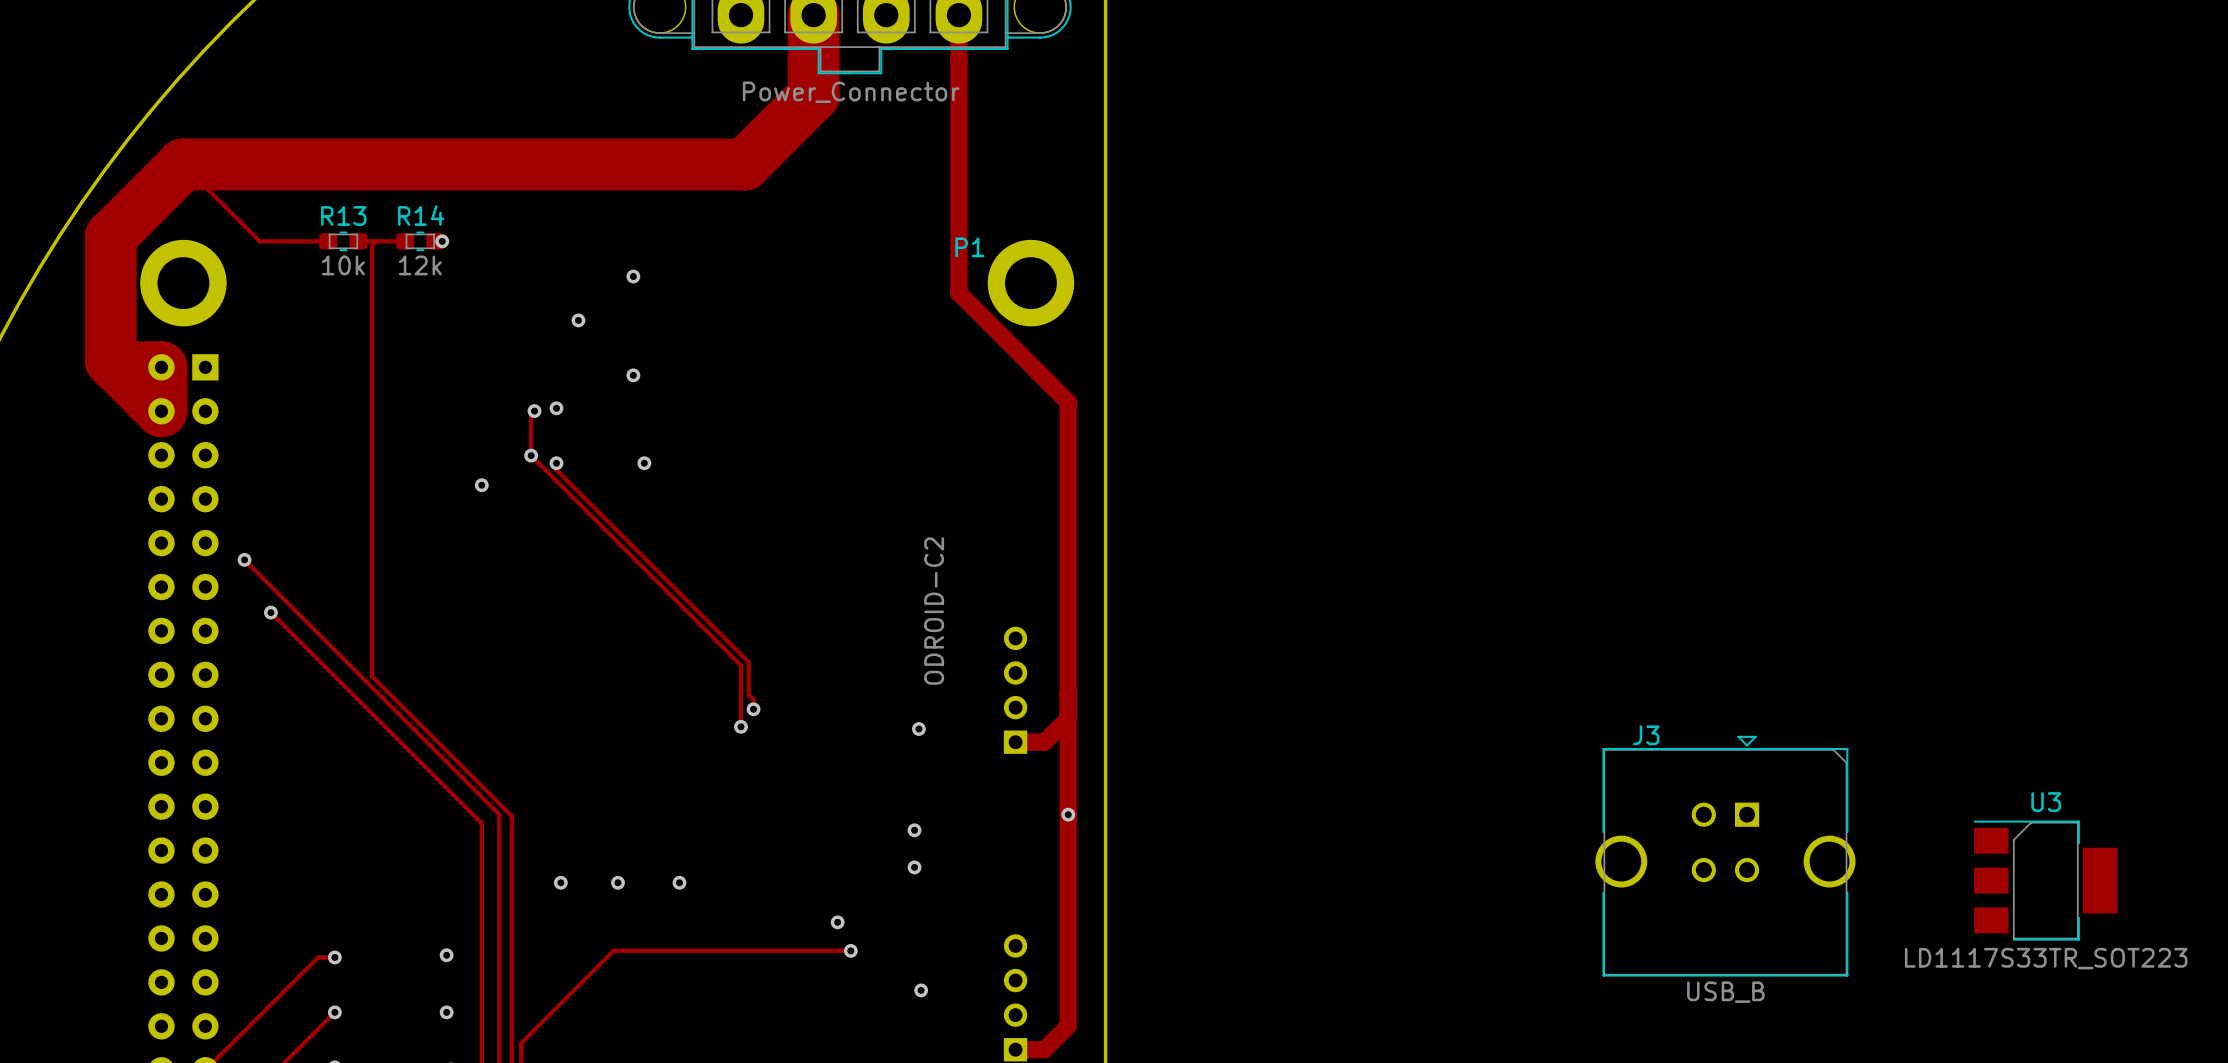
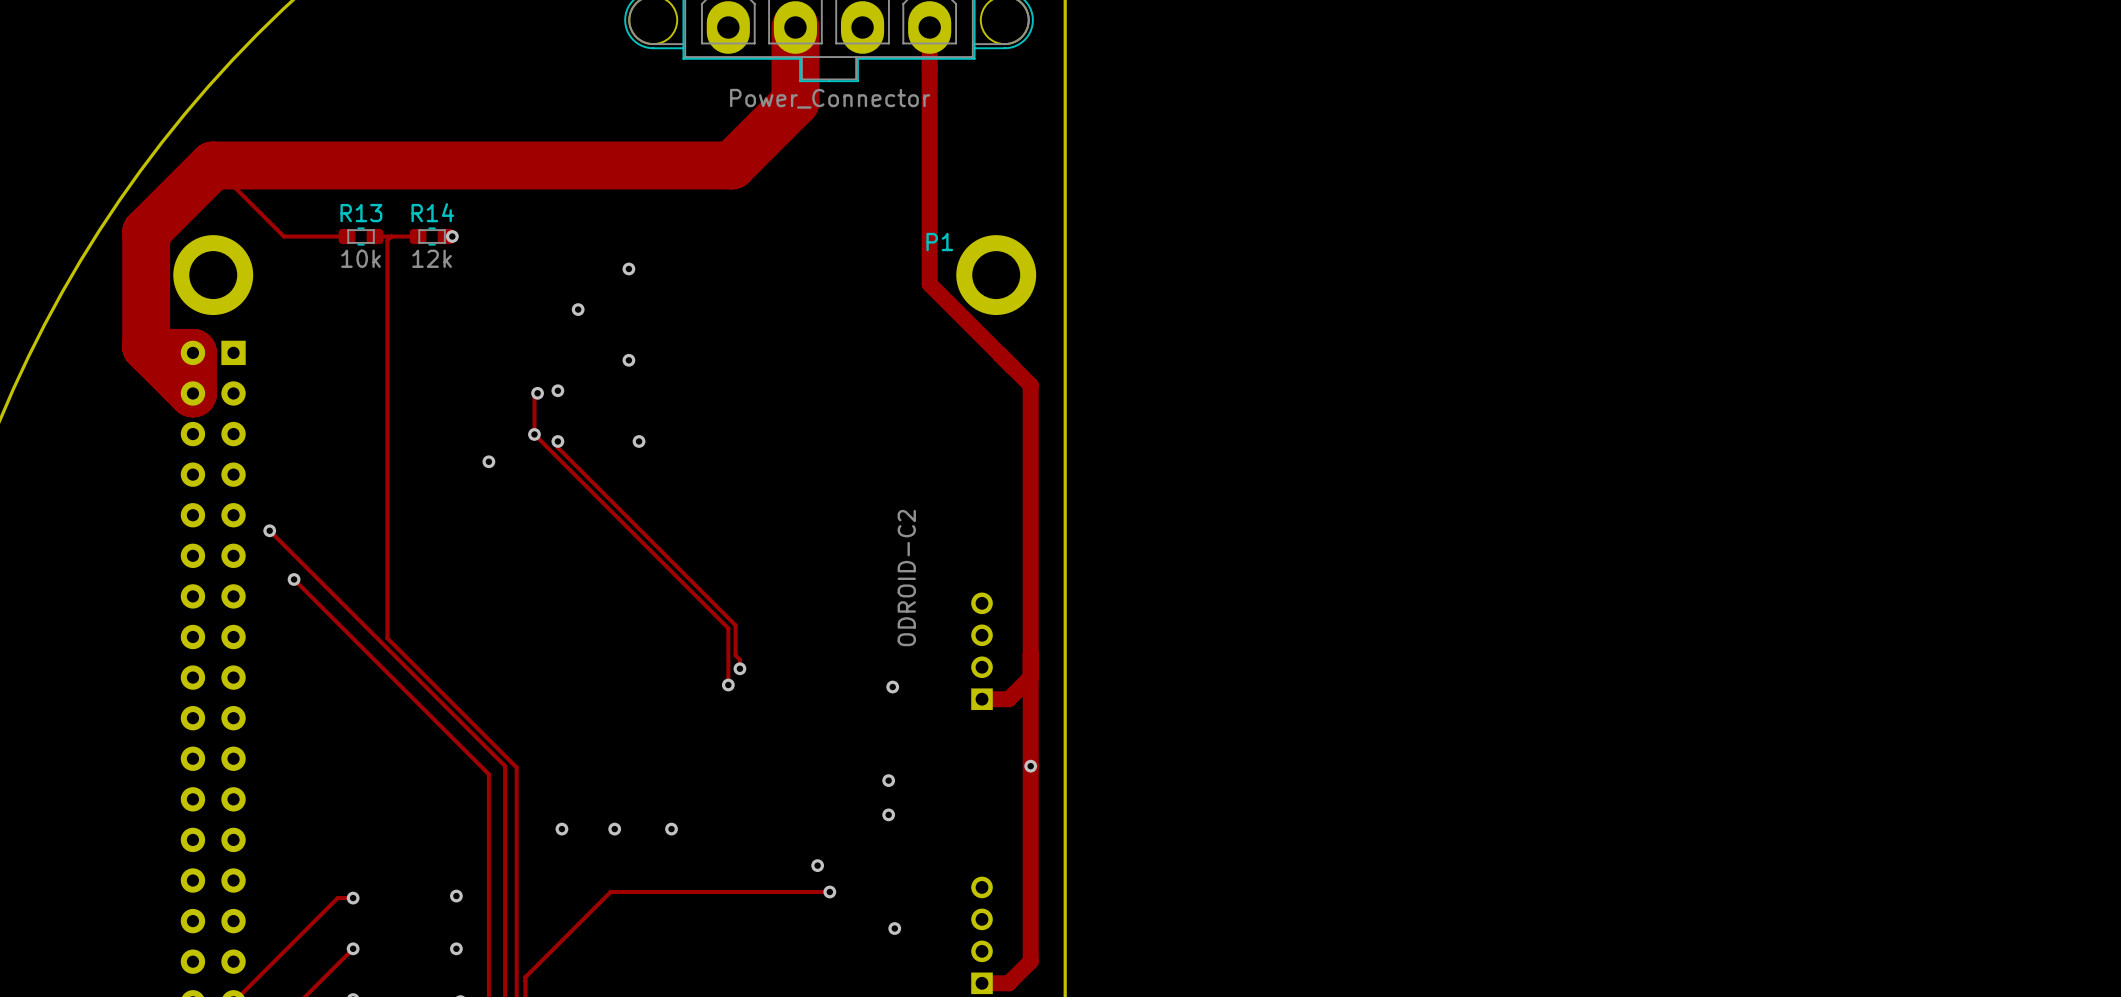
J3: USB_B (1725, 856) -> none
U3: LD1117S33TR_SOT223 (2045, 880) -> none

